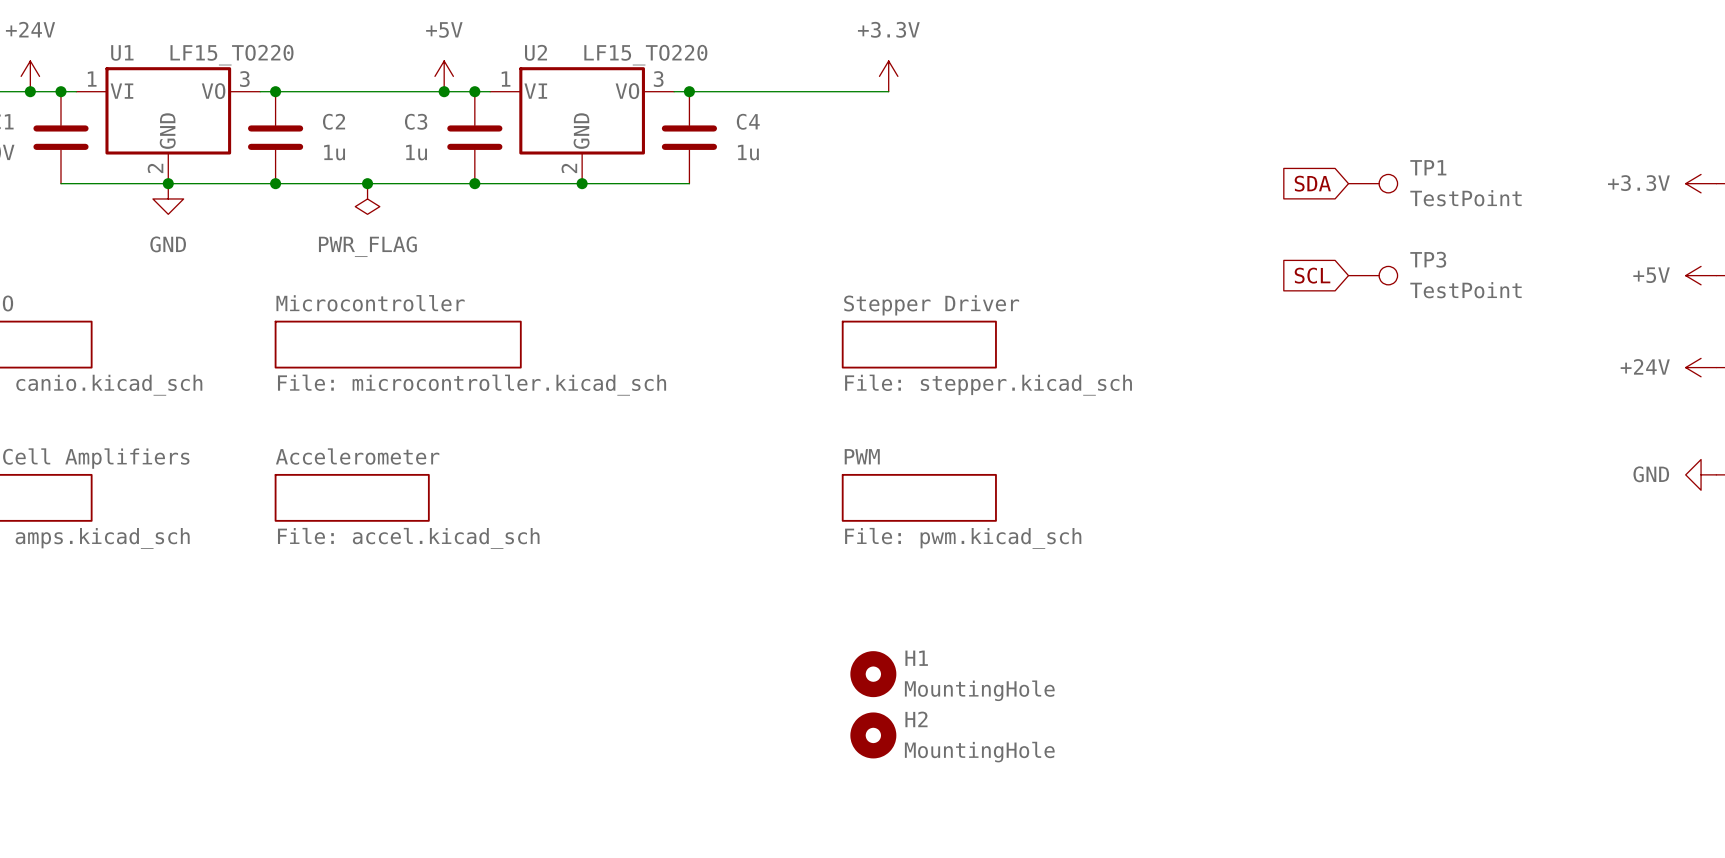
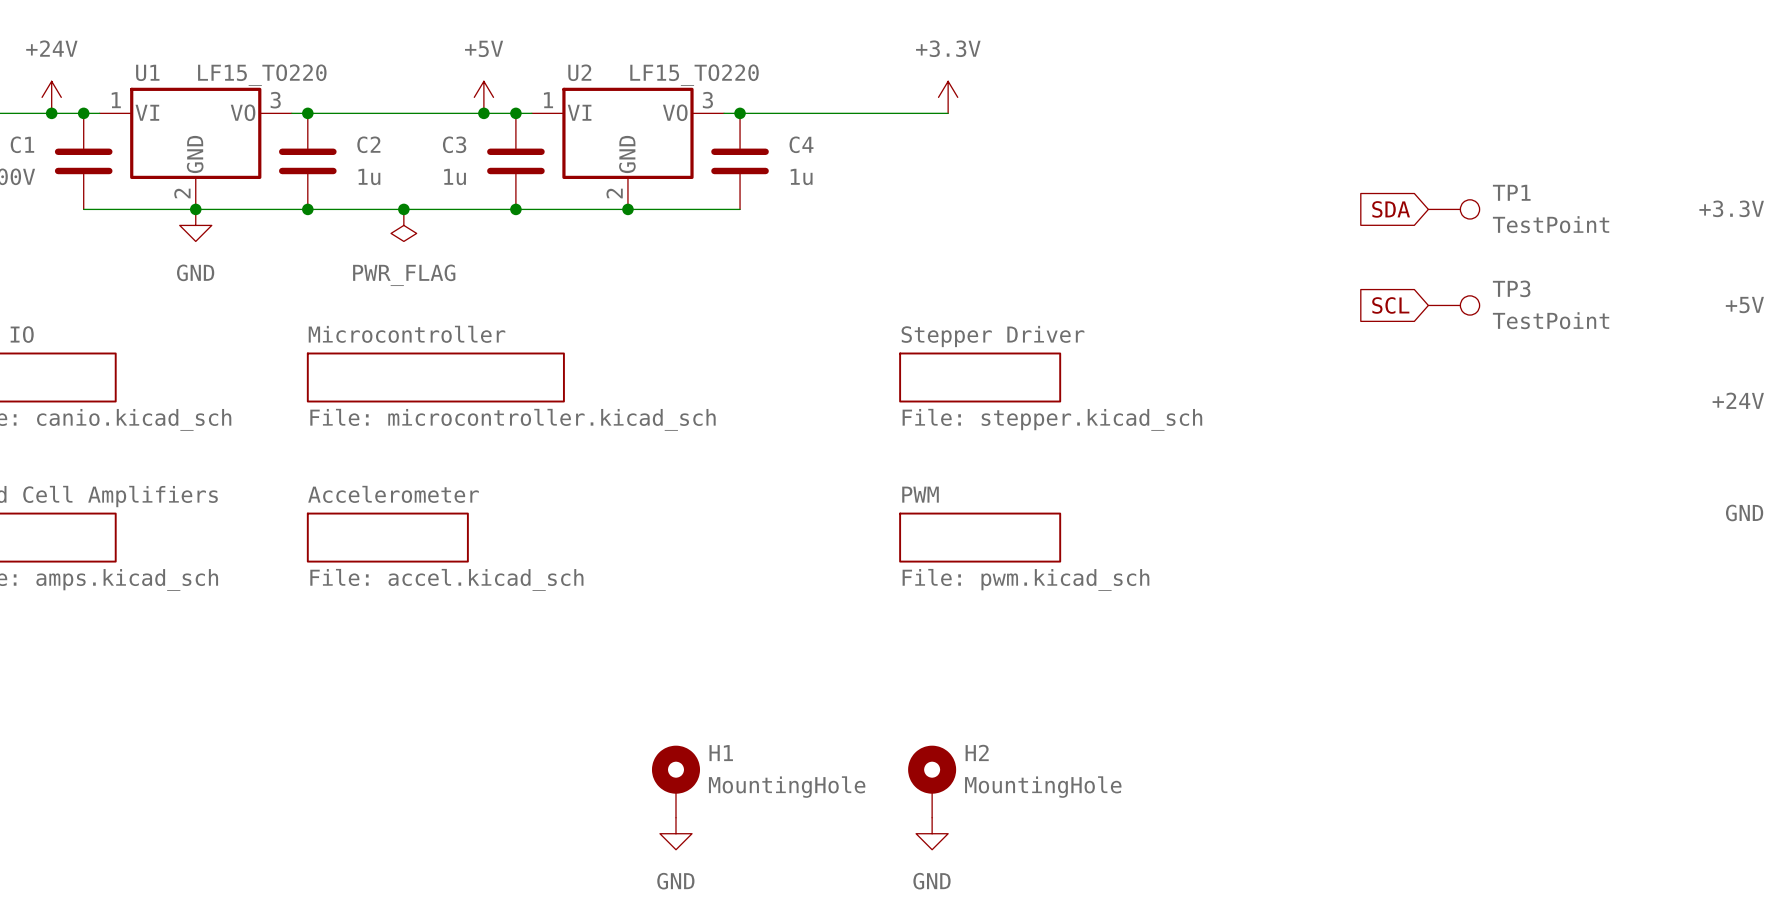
H1 symbol: [850, 651, 897, 698] -> [651, 745, 701, 818]
H2 symbol: [850, 712, 897, 759] -> [908, 745, 957, 818]
power symbol: none -> GND (675, 833)
power symbol: none -> GND (932, 833)

